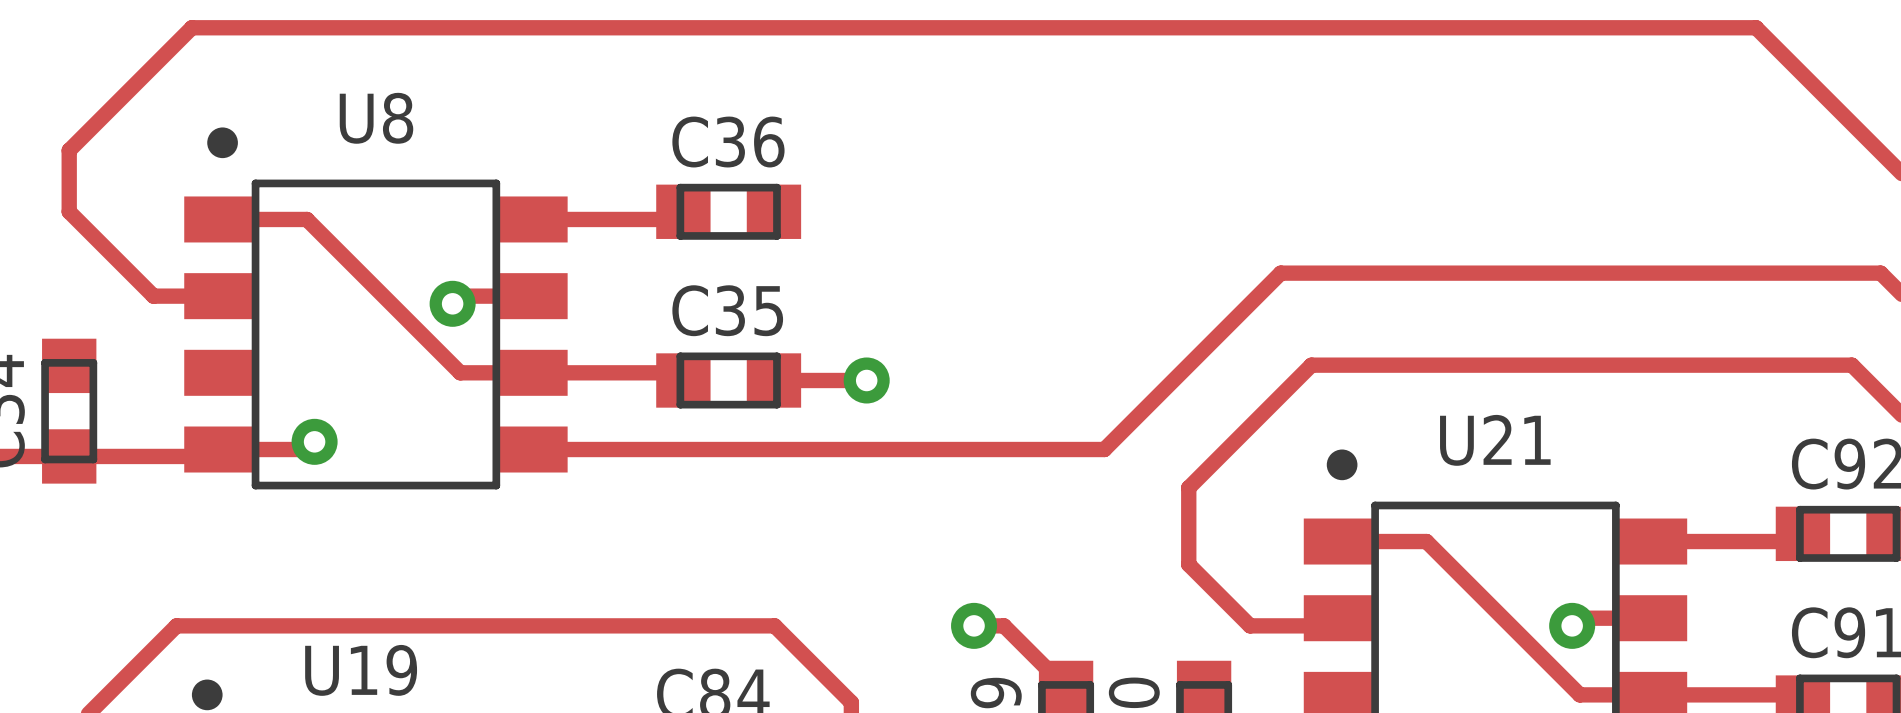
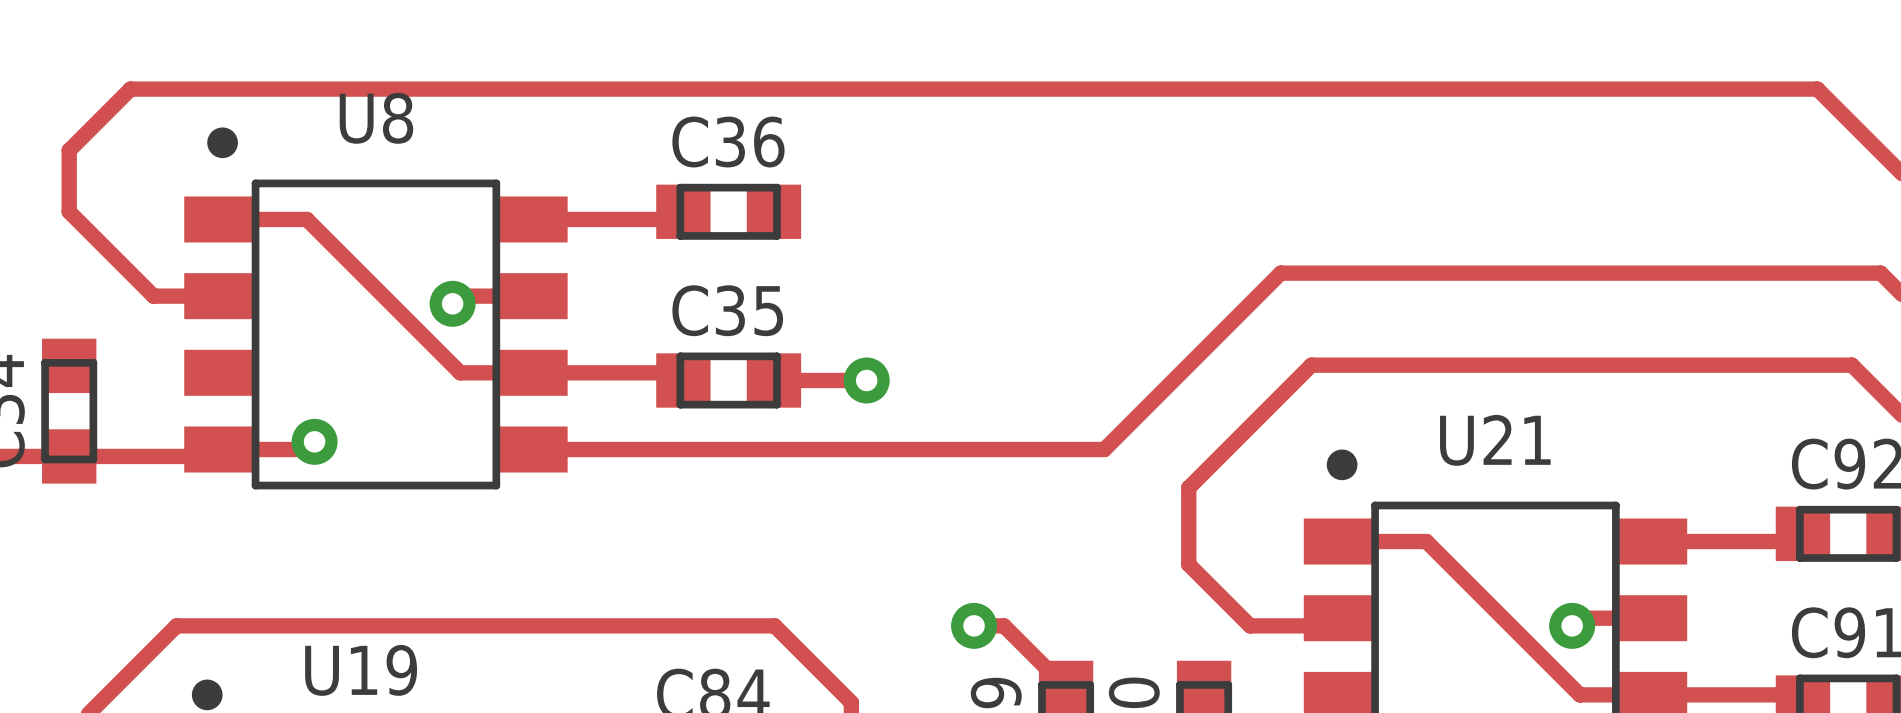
track: (130, 89) (191, 27) (1756, 27) (1817, 89) -> (130, 89) (1817, 89)

